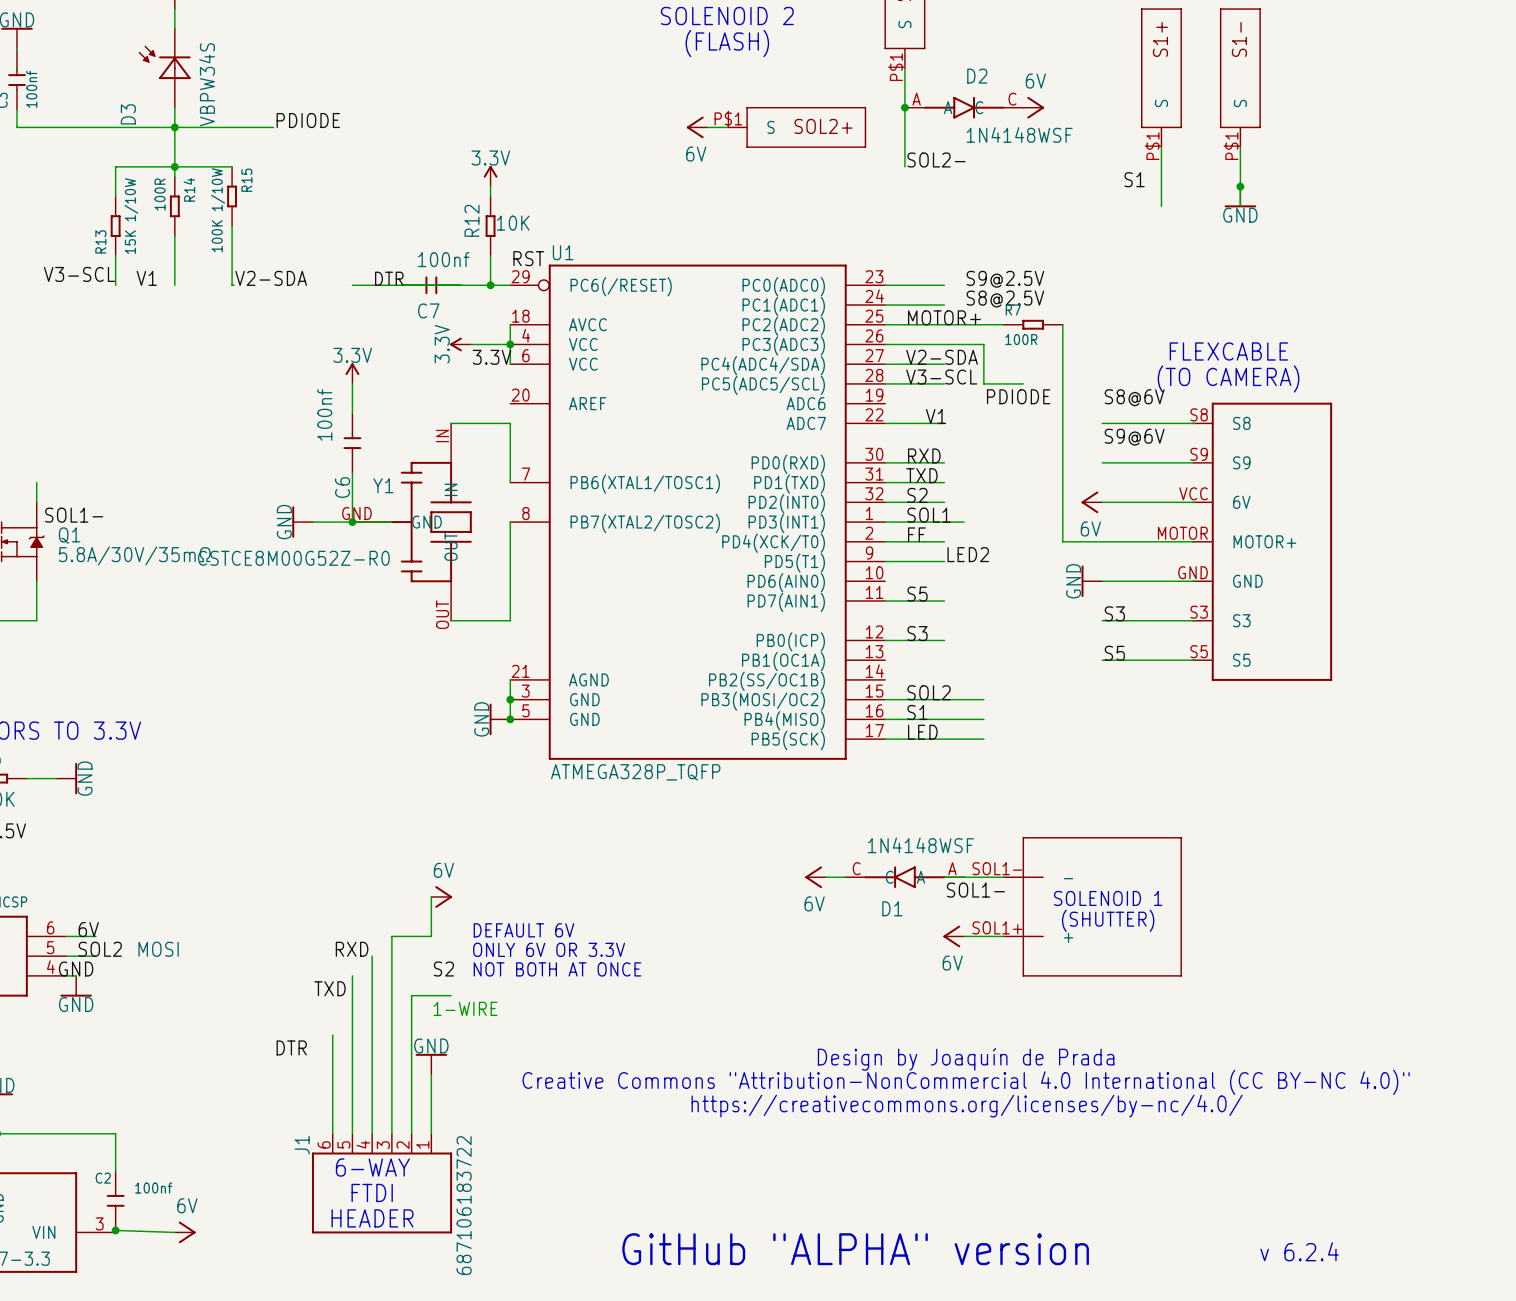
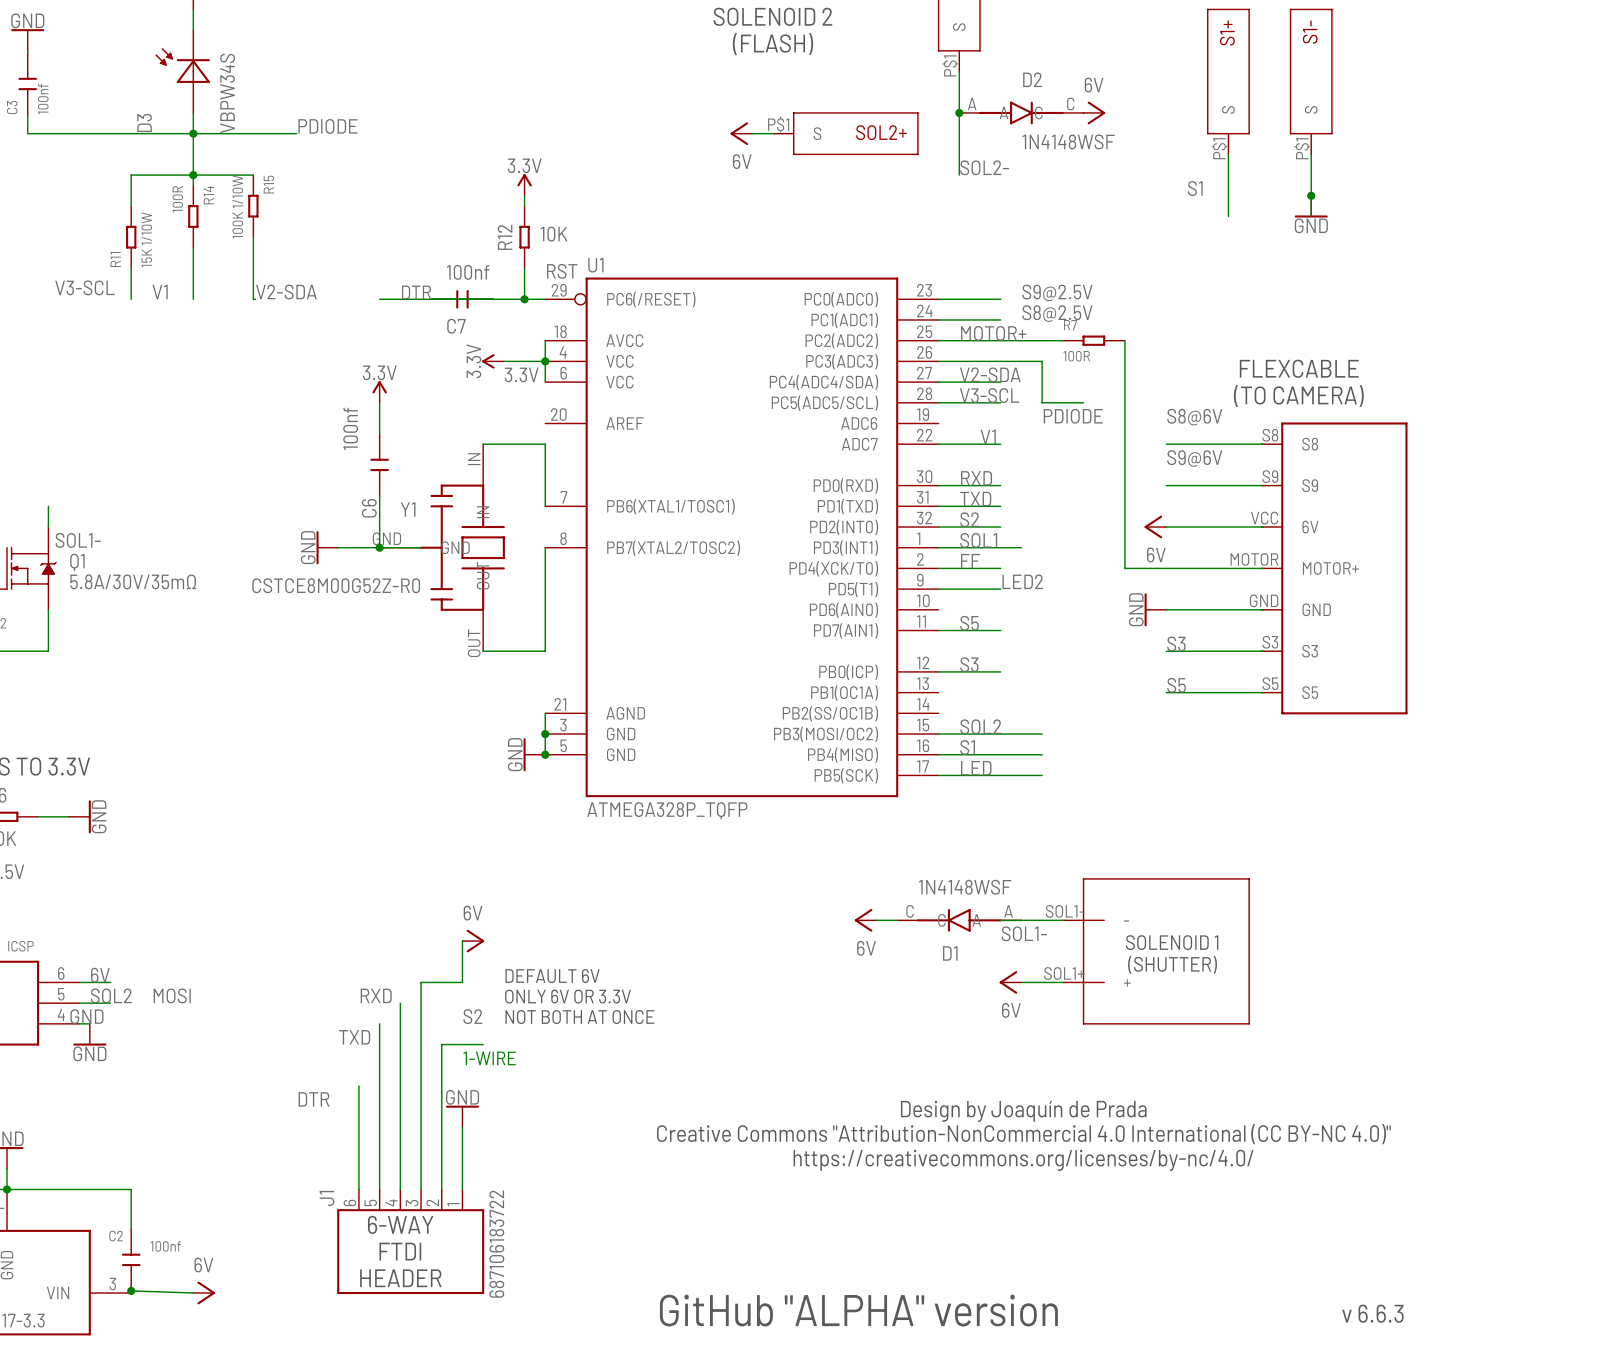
R13 name: R13 (100, 241) -> R11 (115, 259)
text: v 6.2.4 (1299, 1251) -> v 6.6.3 (1372, 1313)

